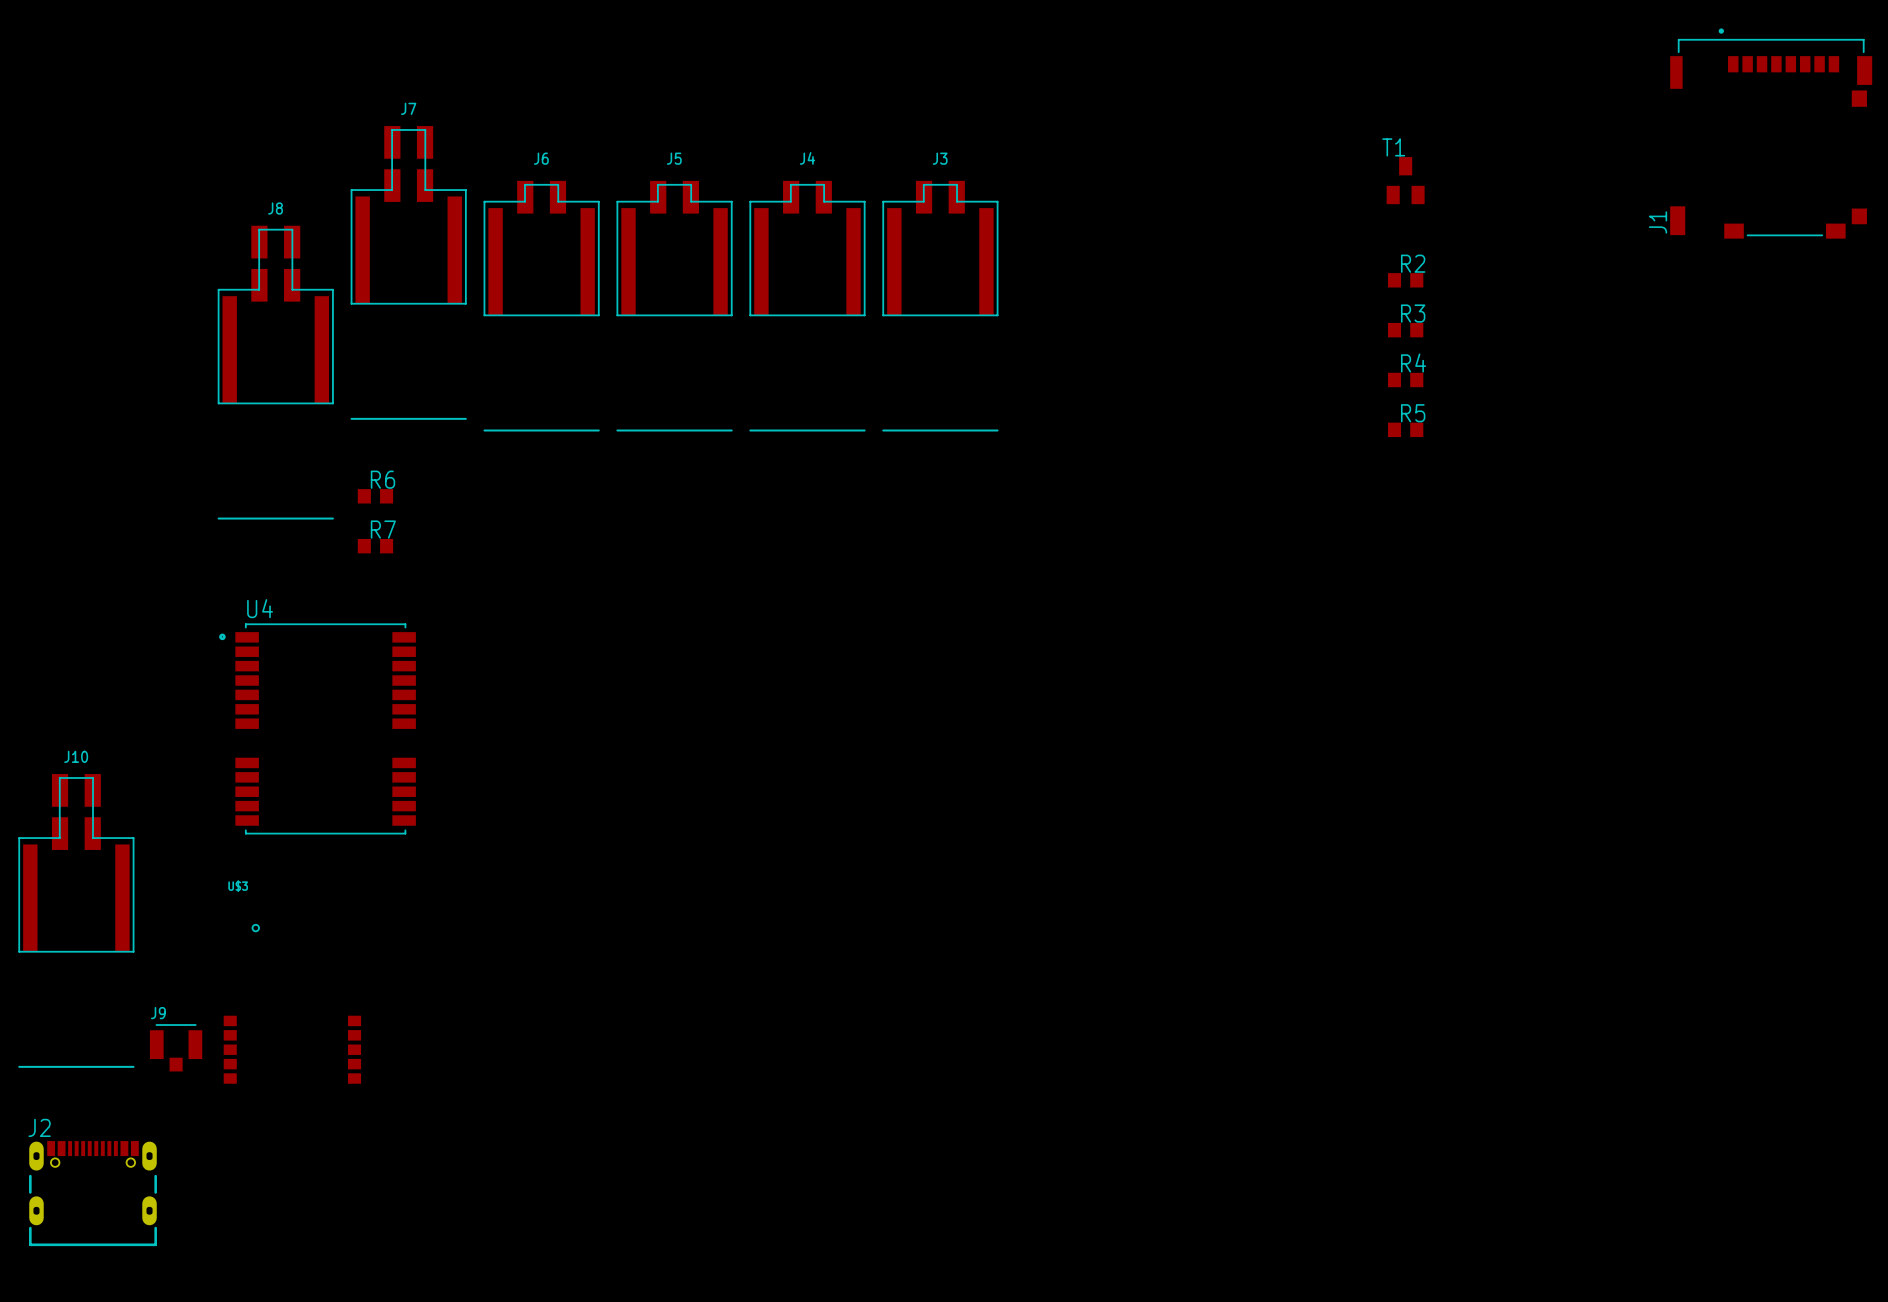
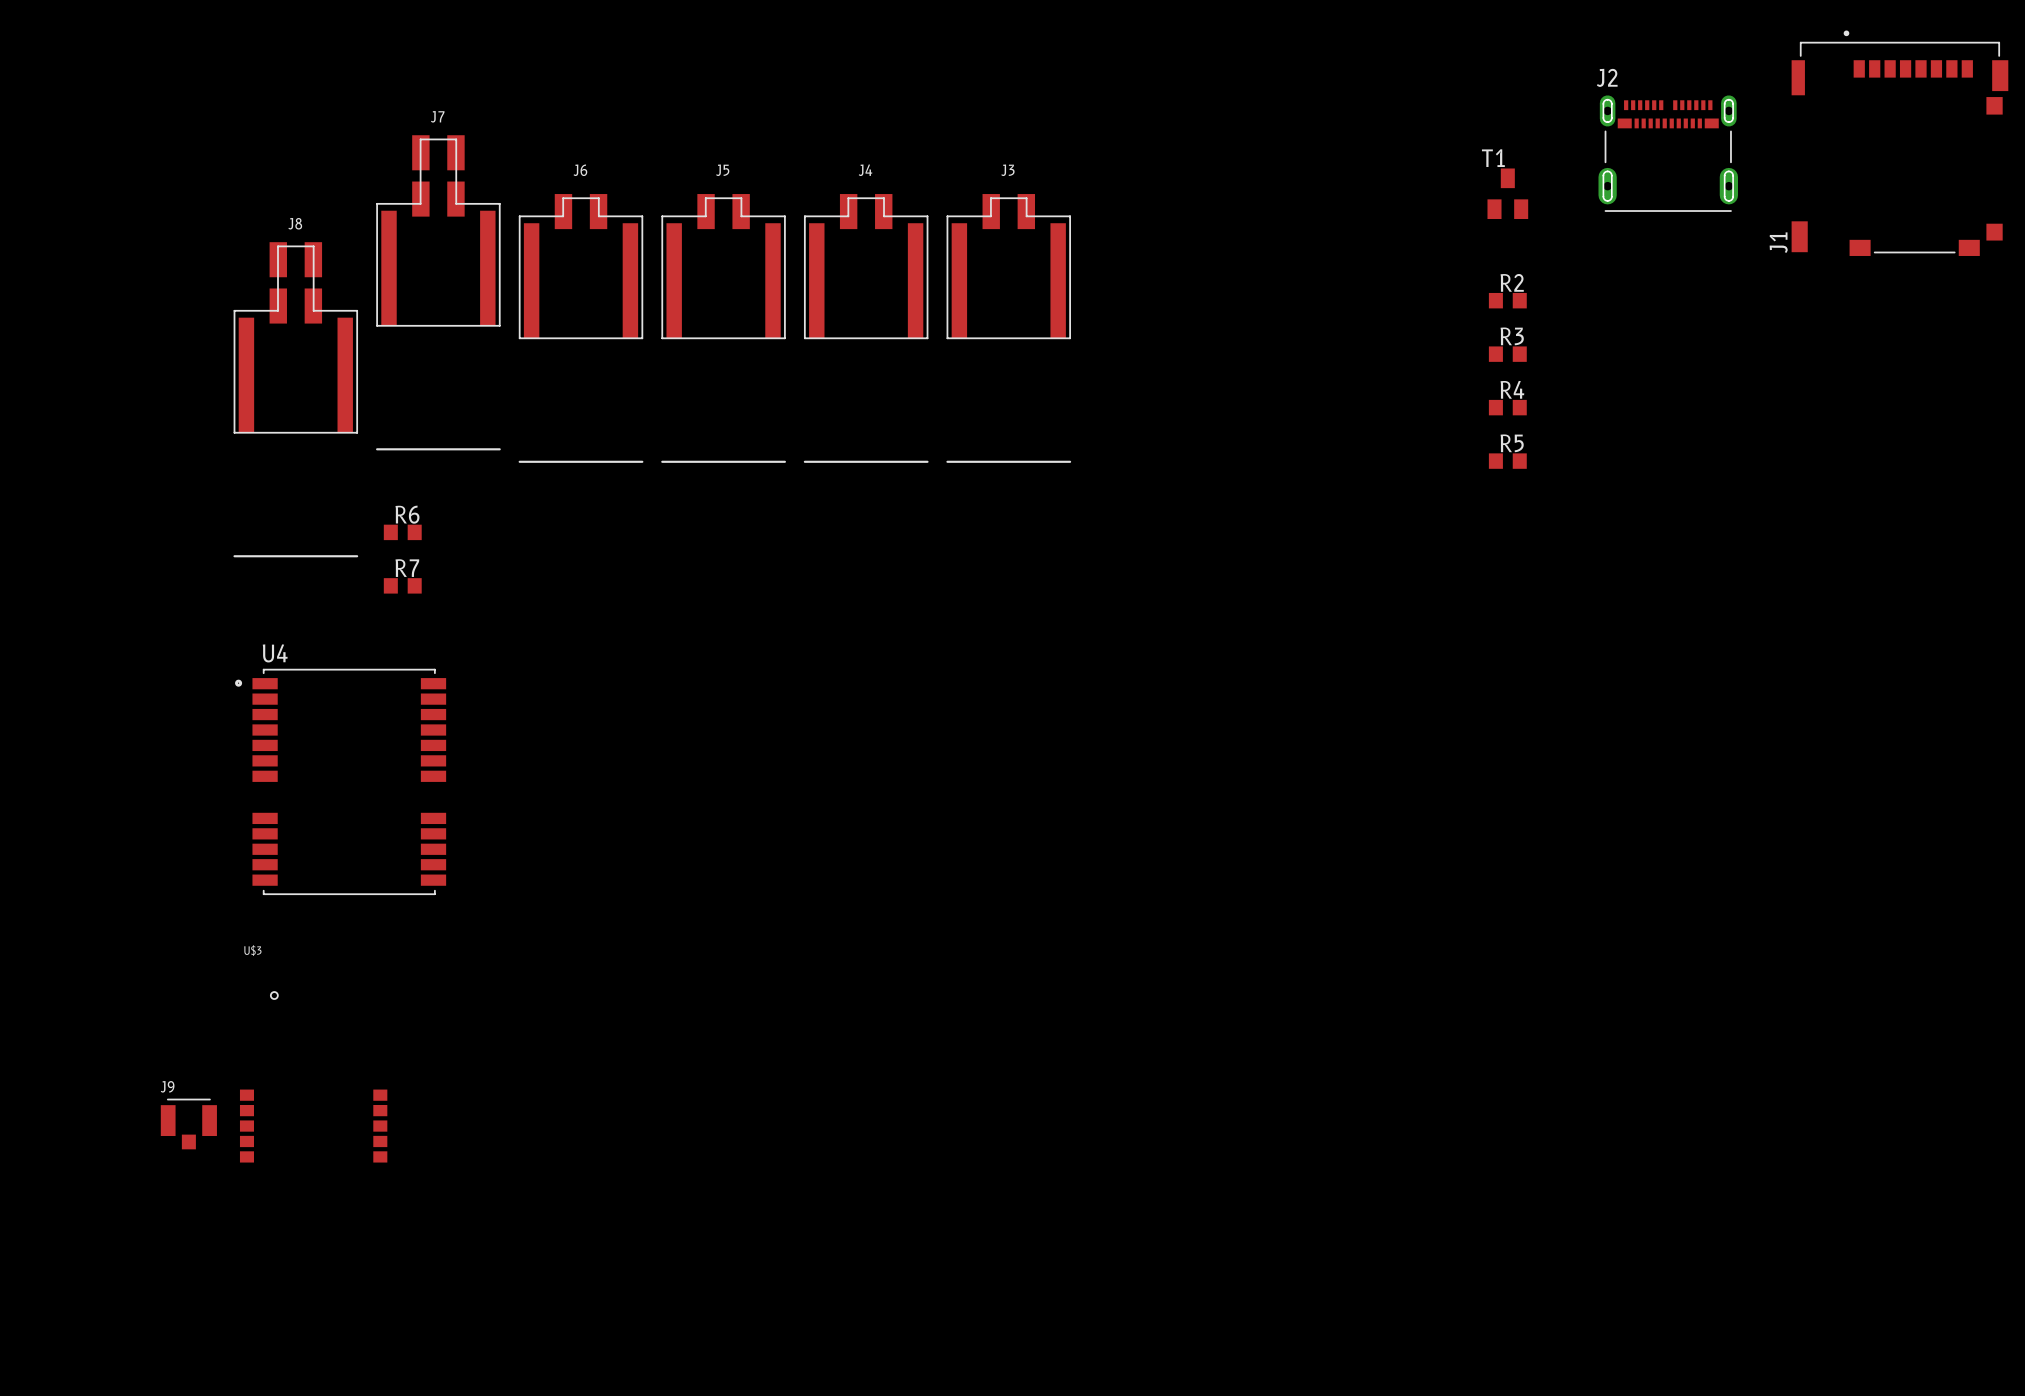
J10: (76, 920) -> none
J2 footprint: [29, 1141, 157, 1247] -> [1598, 95, 1738, 212]

